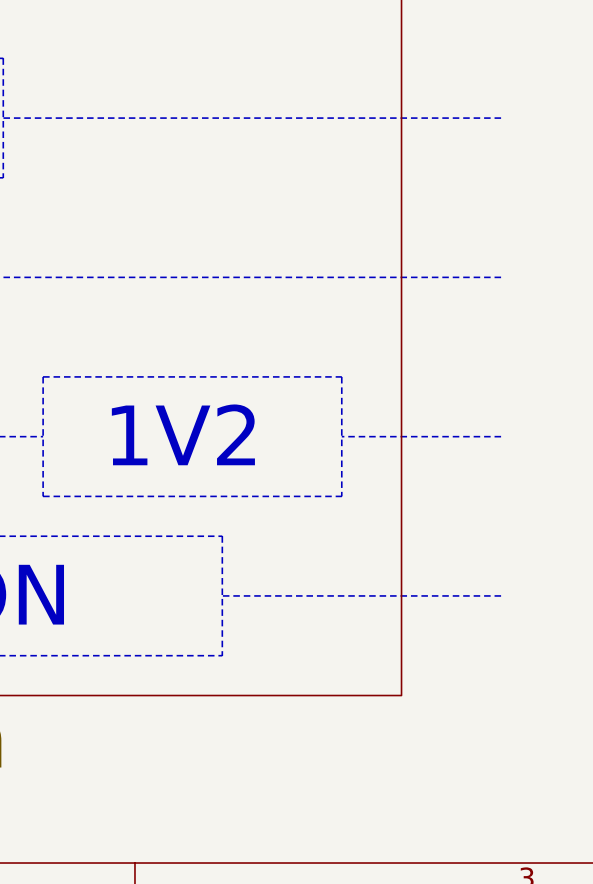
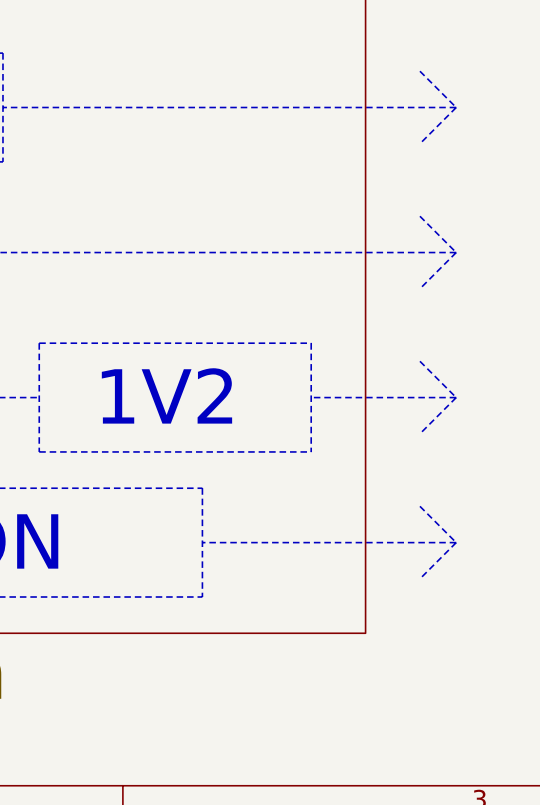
line: none -> (419, 71) (456, 107) (419, 143)
line: none -> (419, 216) (456, 252) (419, 288)
line: none -> (419, 361) (456, 397) (419, 433)
line: none -> (419, 506) (456, 542) (419, 578)

